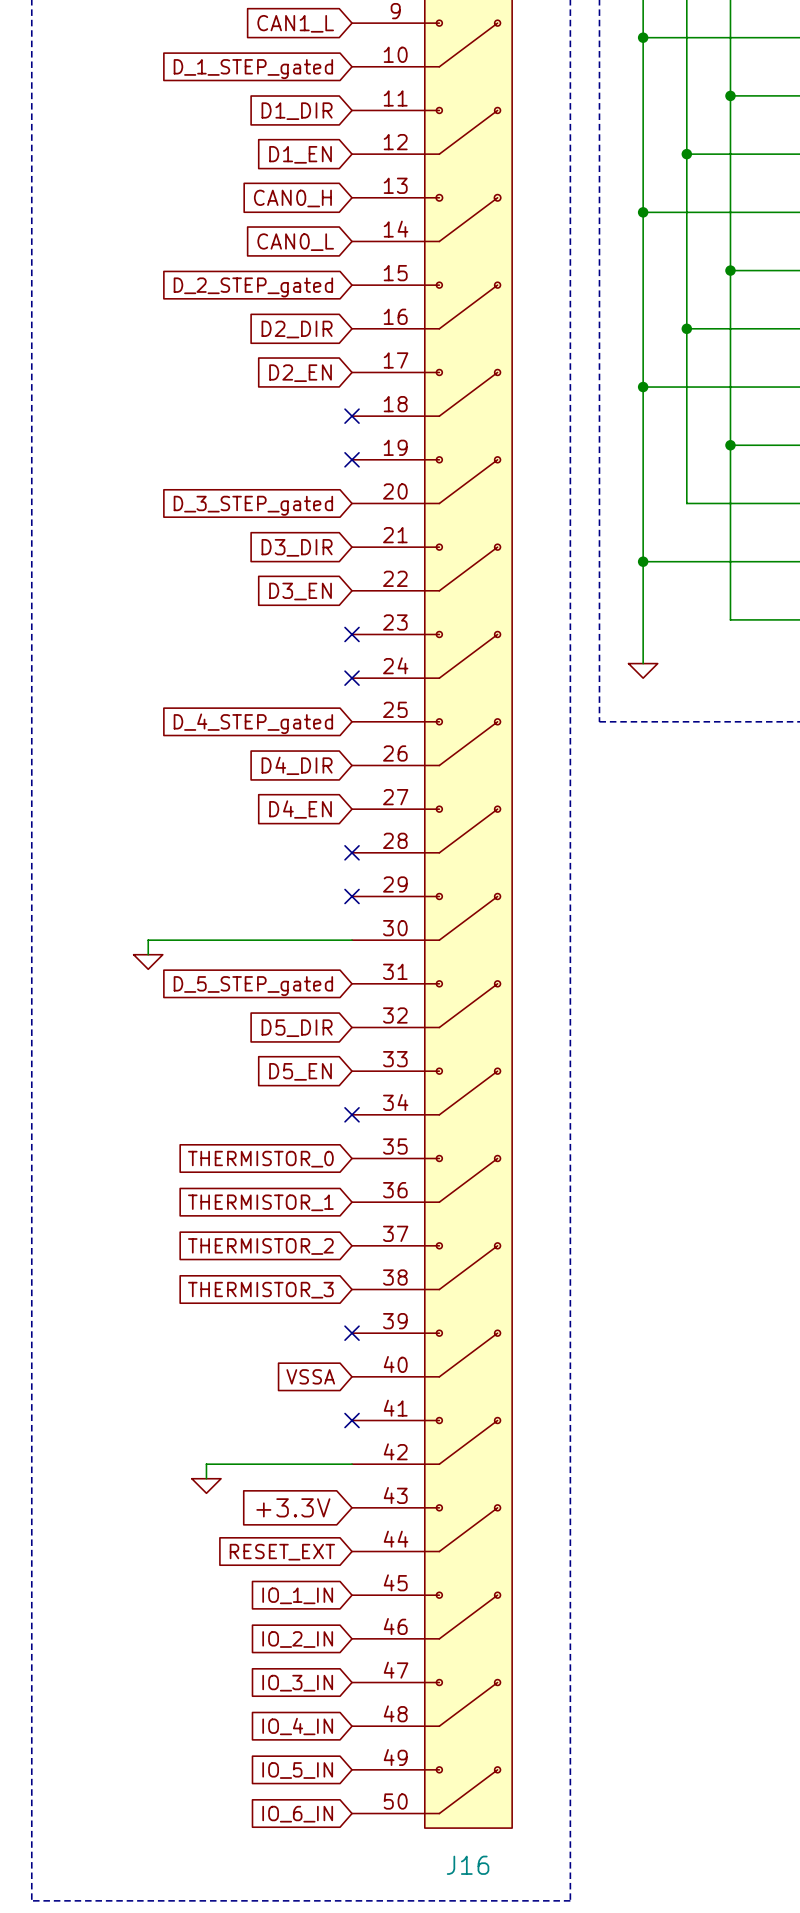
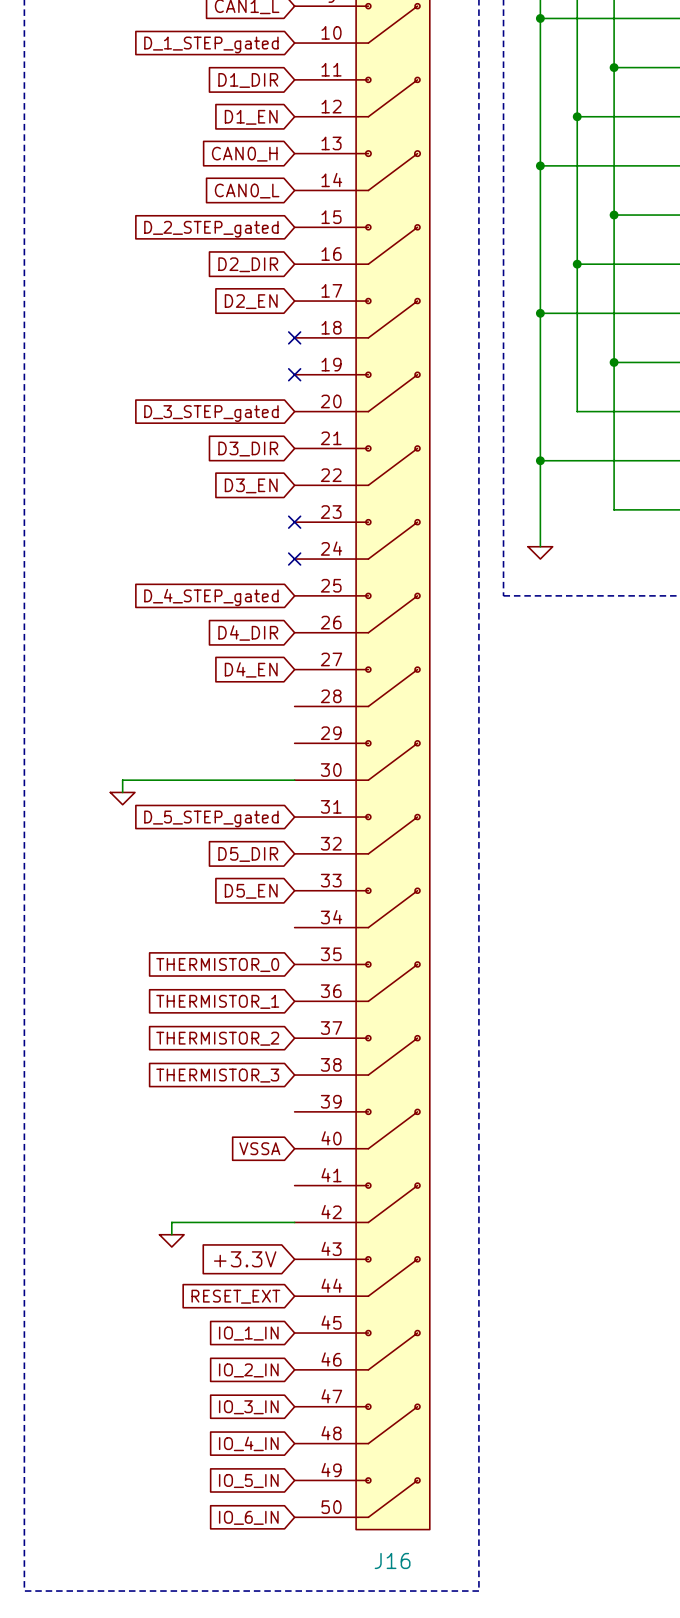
no-connect mark: (352, 852) -> none
no-connect mark: (352, 896) -> none
no-connect mark: (352, 1114) -> none
no-connect mark: (352, 1333) -> none
no-connect mark: (352, 1420) -> none

